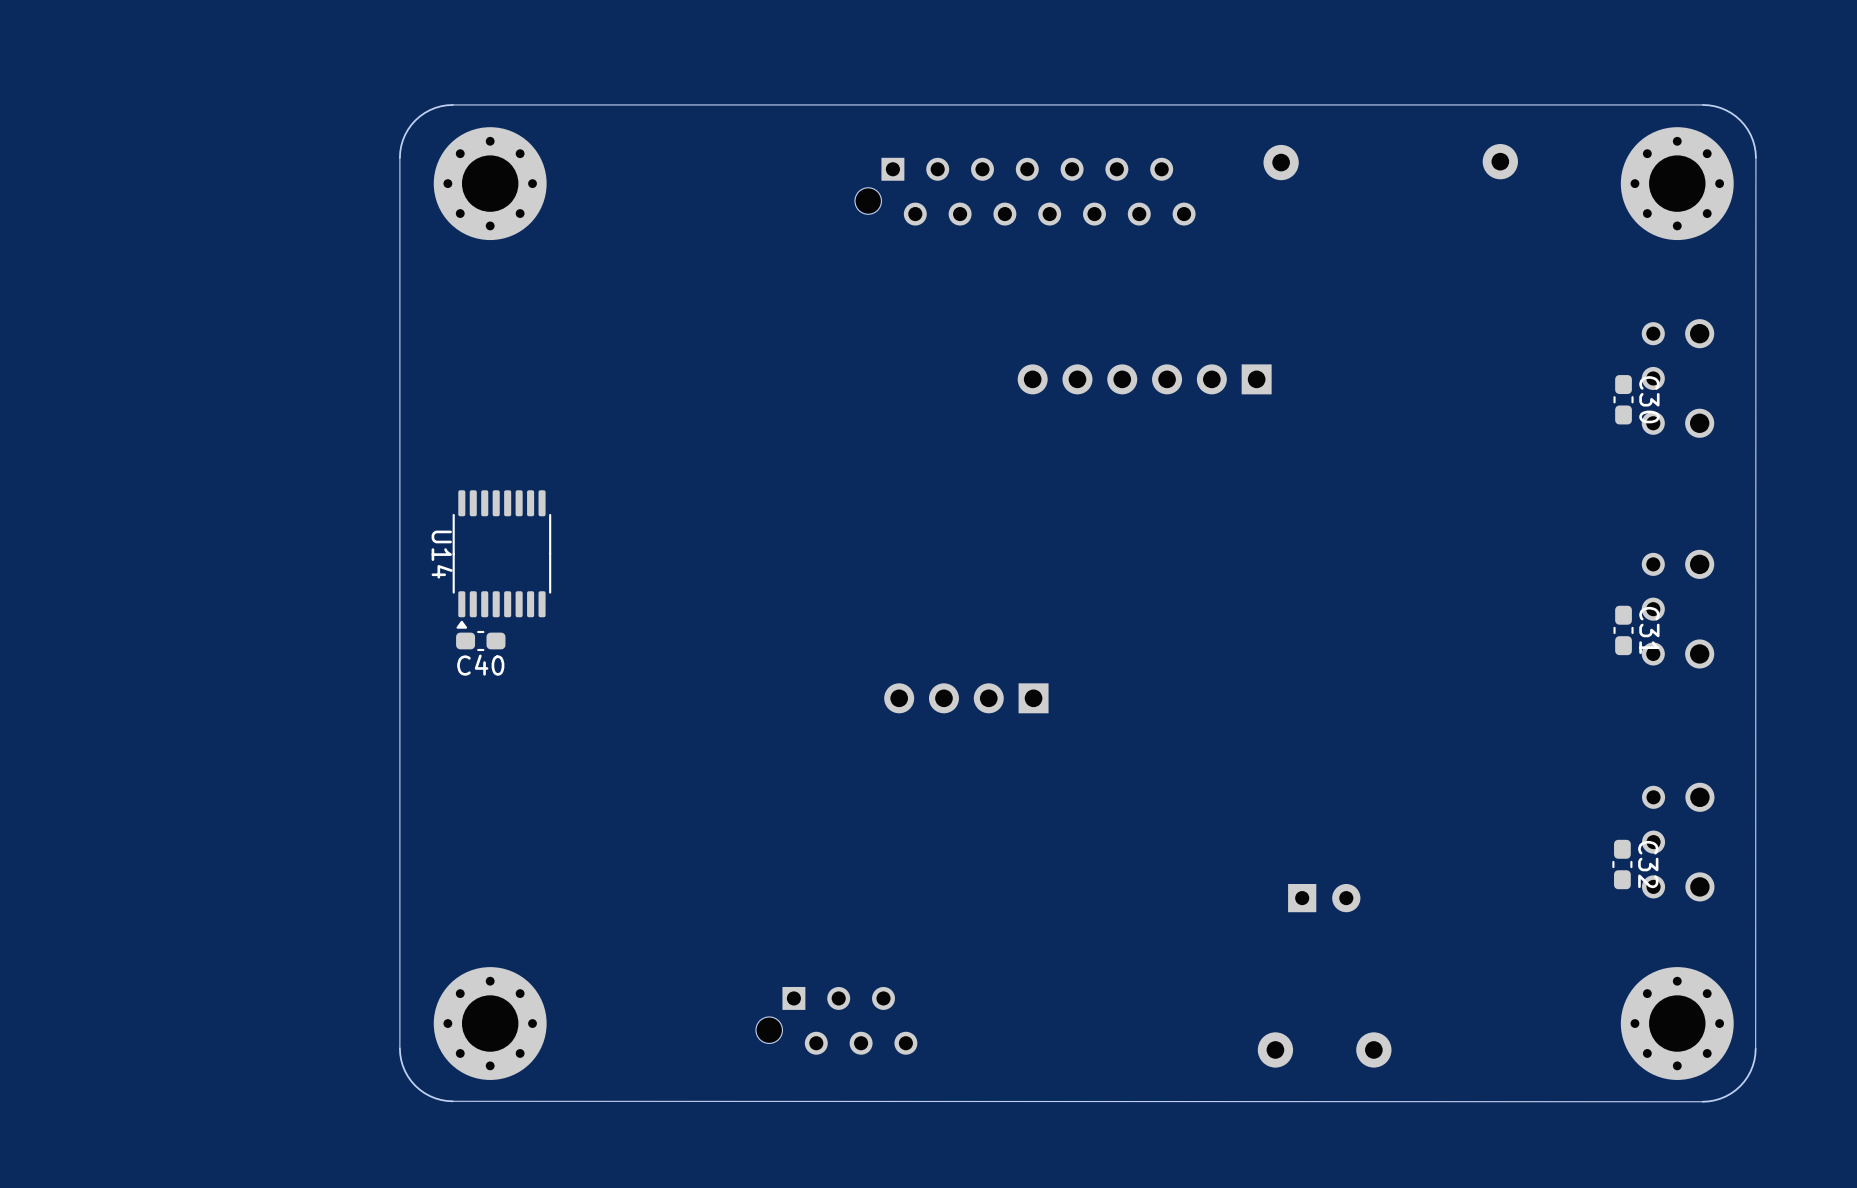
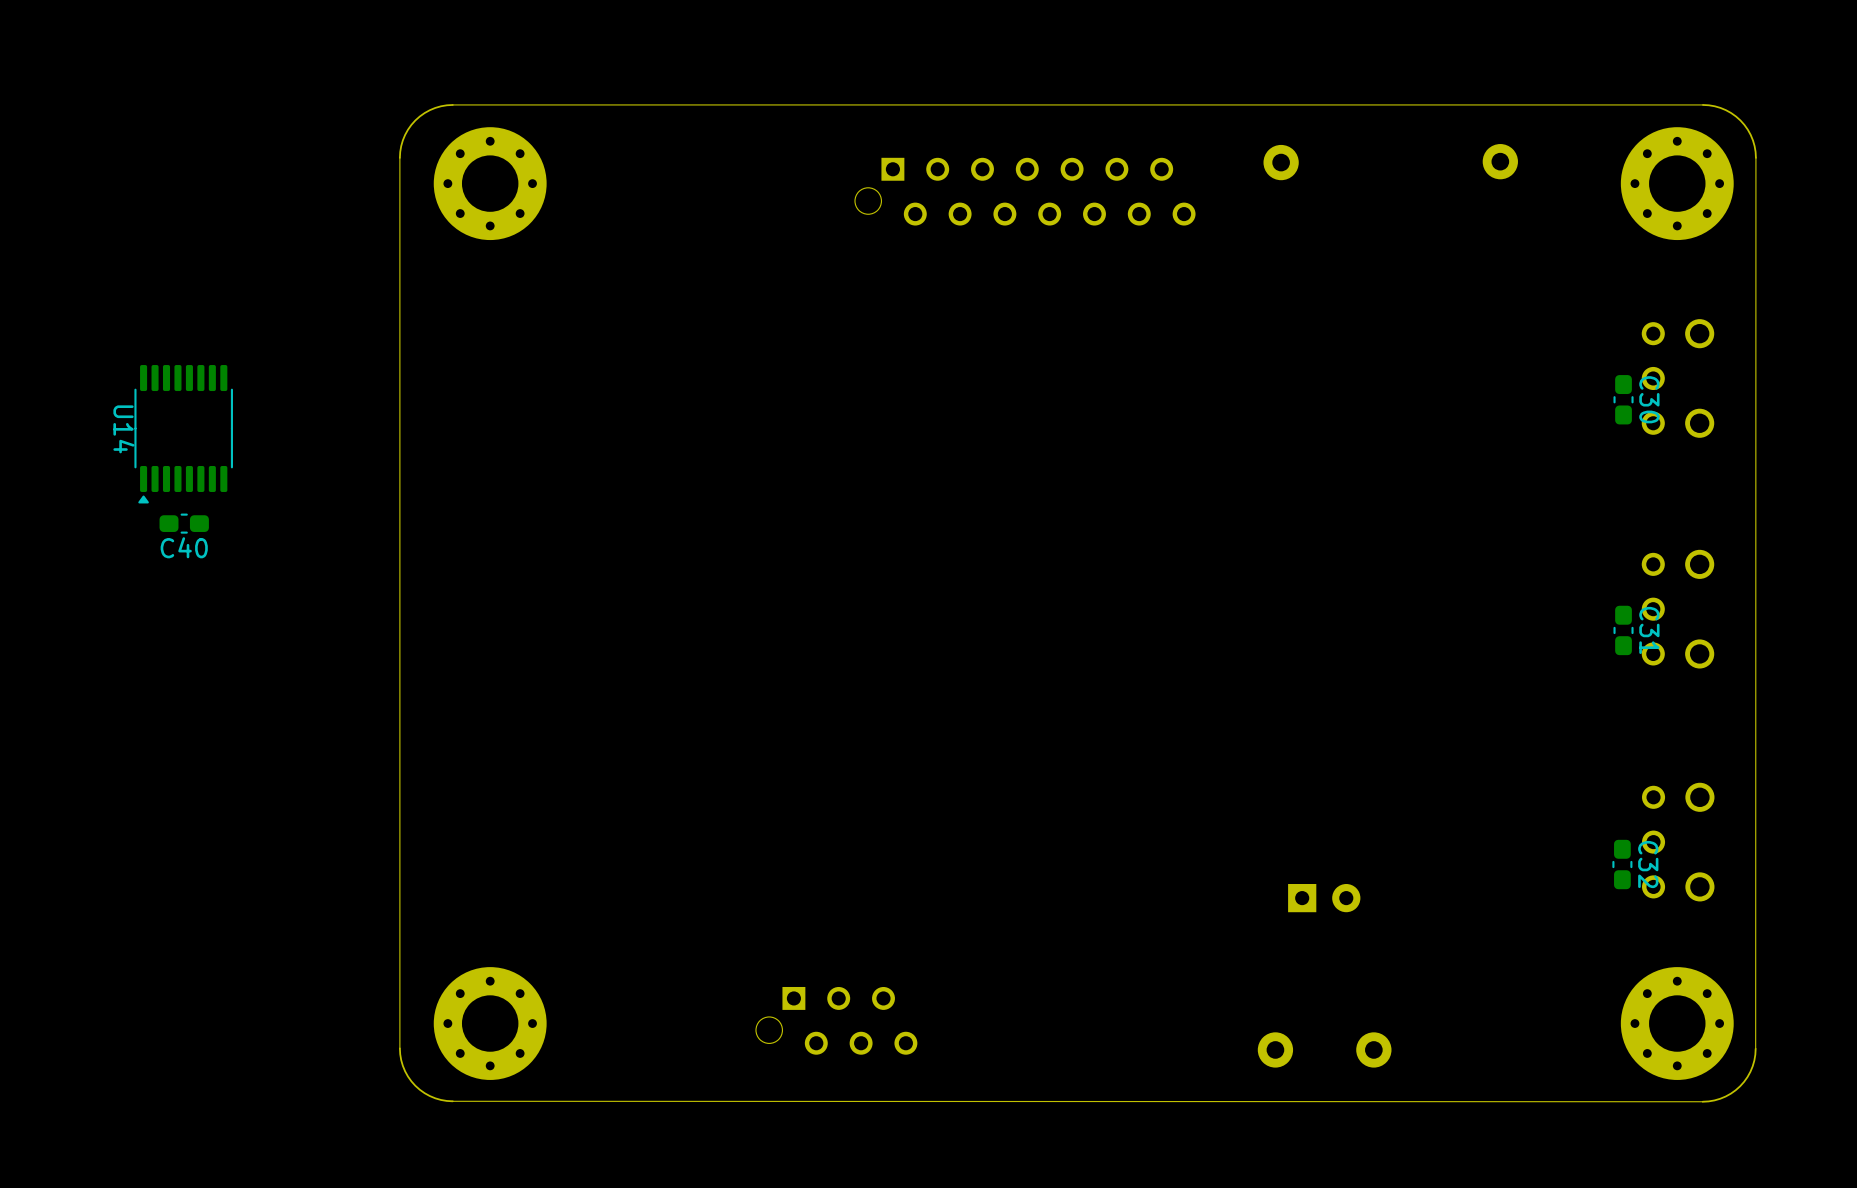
part: (1144, 379) -> none
U14 position: (501, 559) -> (183, 434)
C40 position: (480, 640) -> (184, 523)
part: (966, 698) -> none

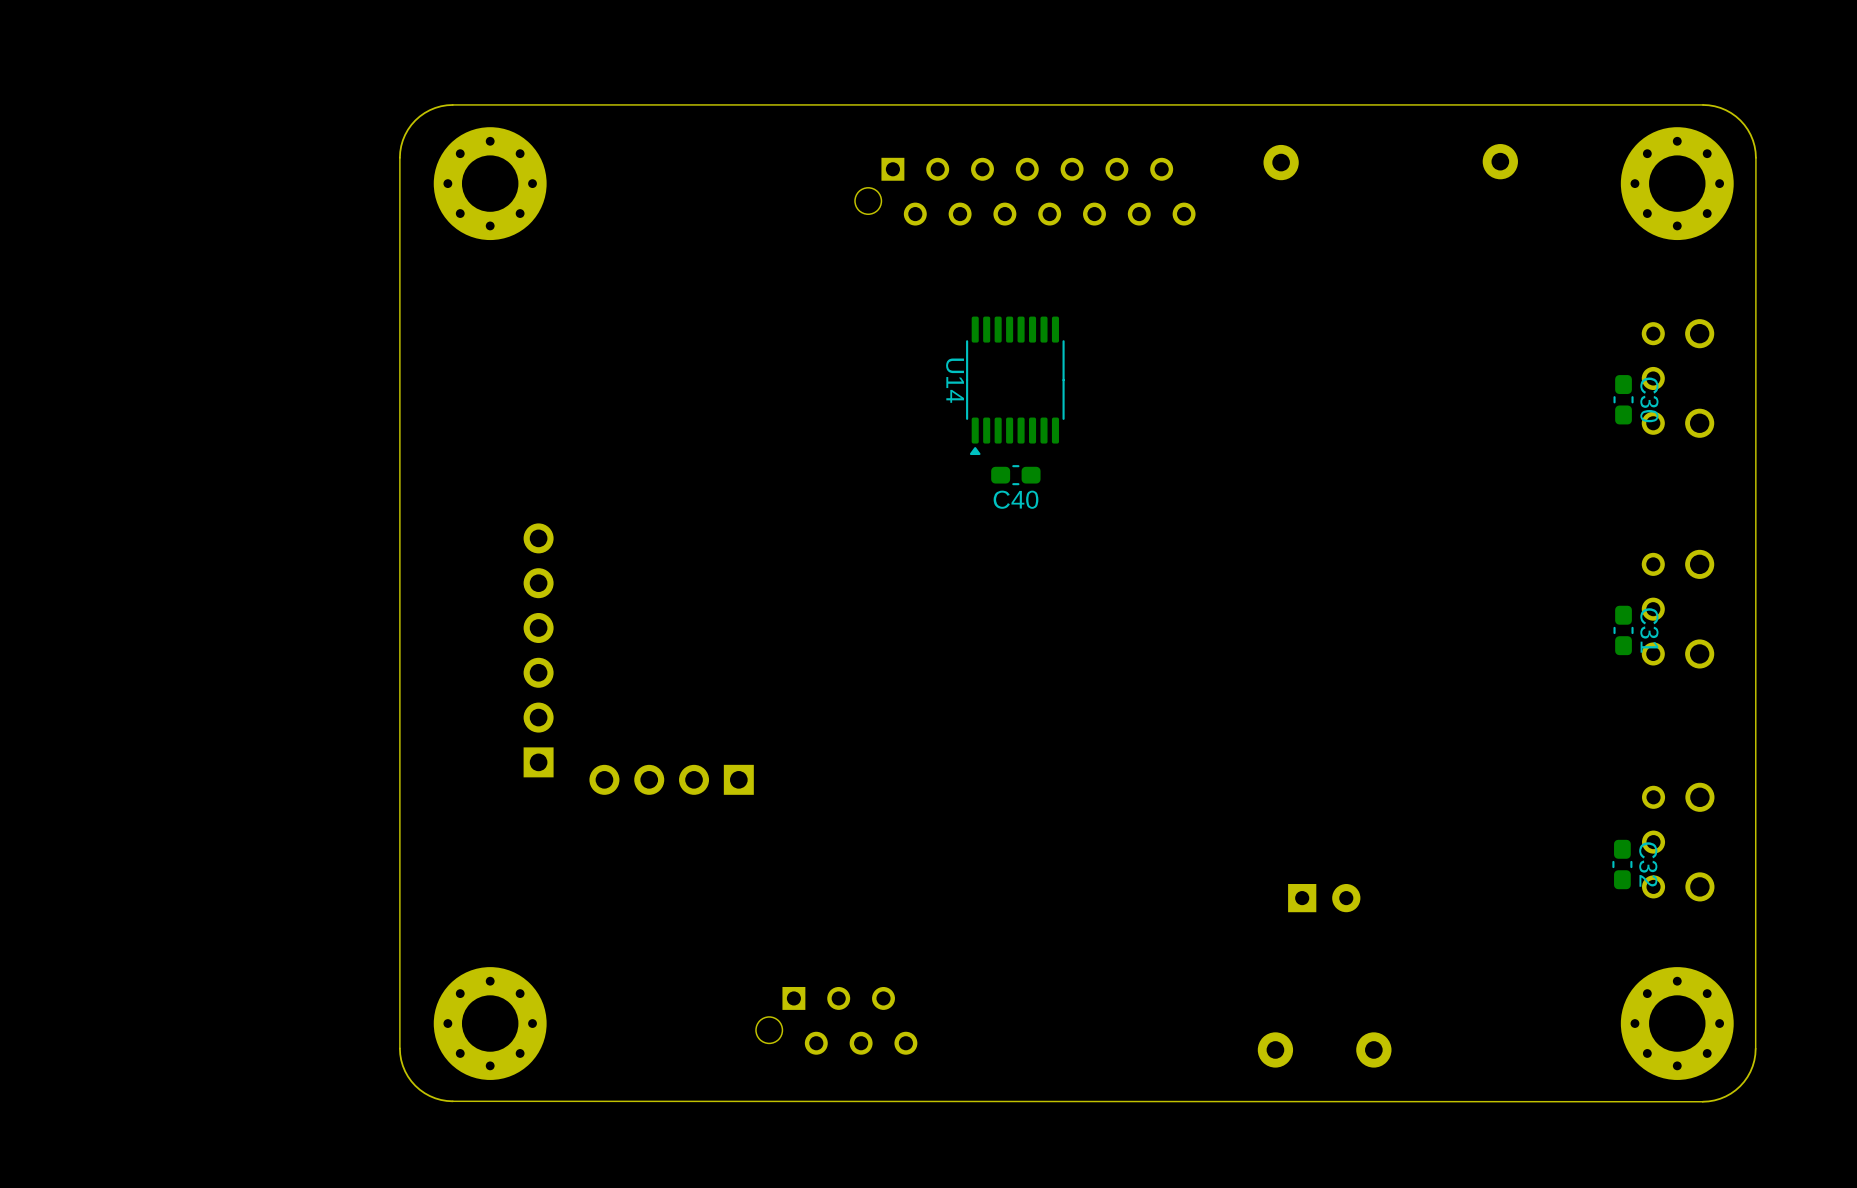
U14 position: (183, 434) -> (1015, 385)
C40 position: (184, 523) -> (1015, 475)
part: none -> (538, 650)
part: none -> (671, 779)

